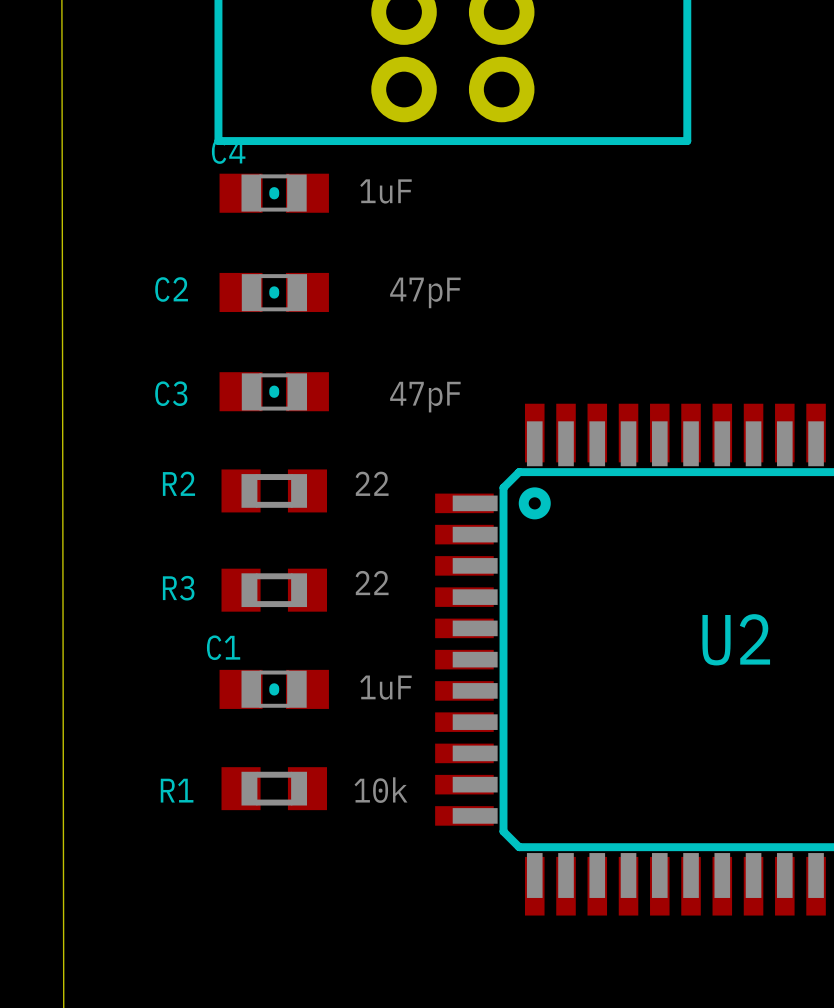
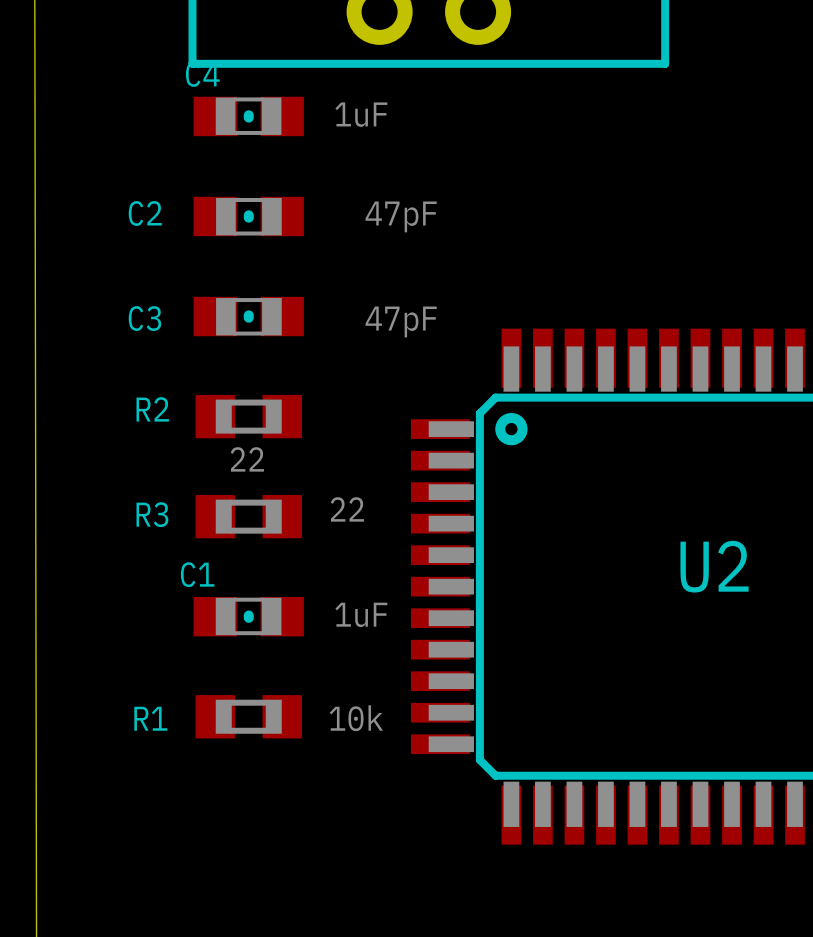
R2 value position: 22 (372, 483) -> 22 (247, 459)

